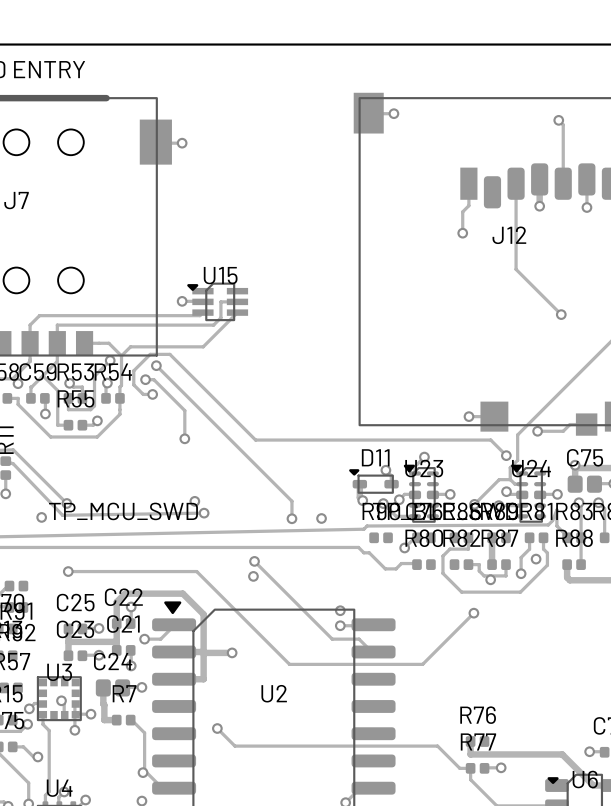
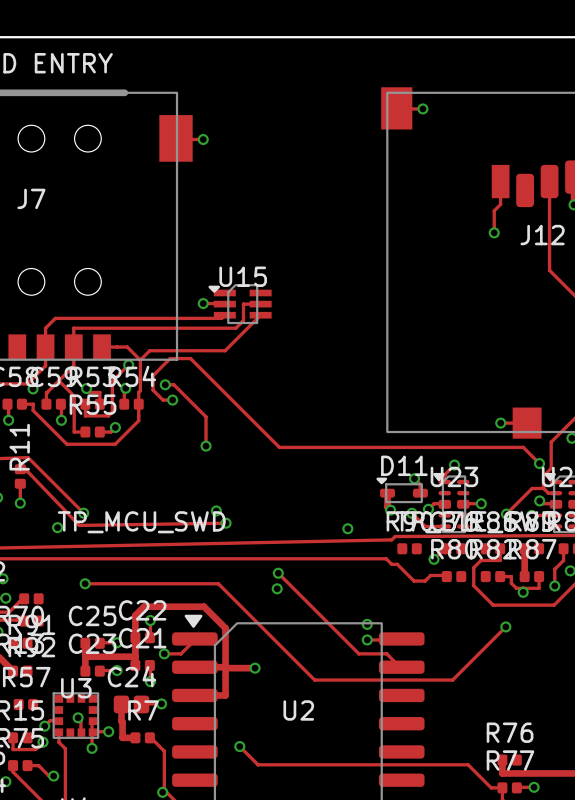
track: (156, 365) (291, 501) (291, 518) -> none
via: (156, 365) -> none
via: (291, 518) -> none

